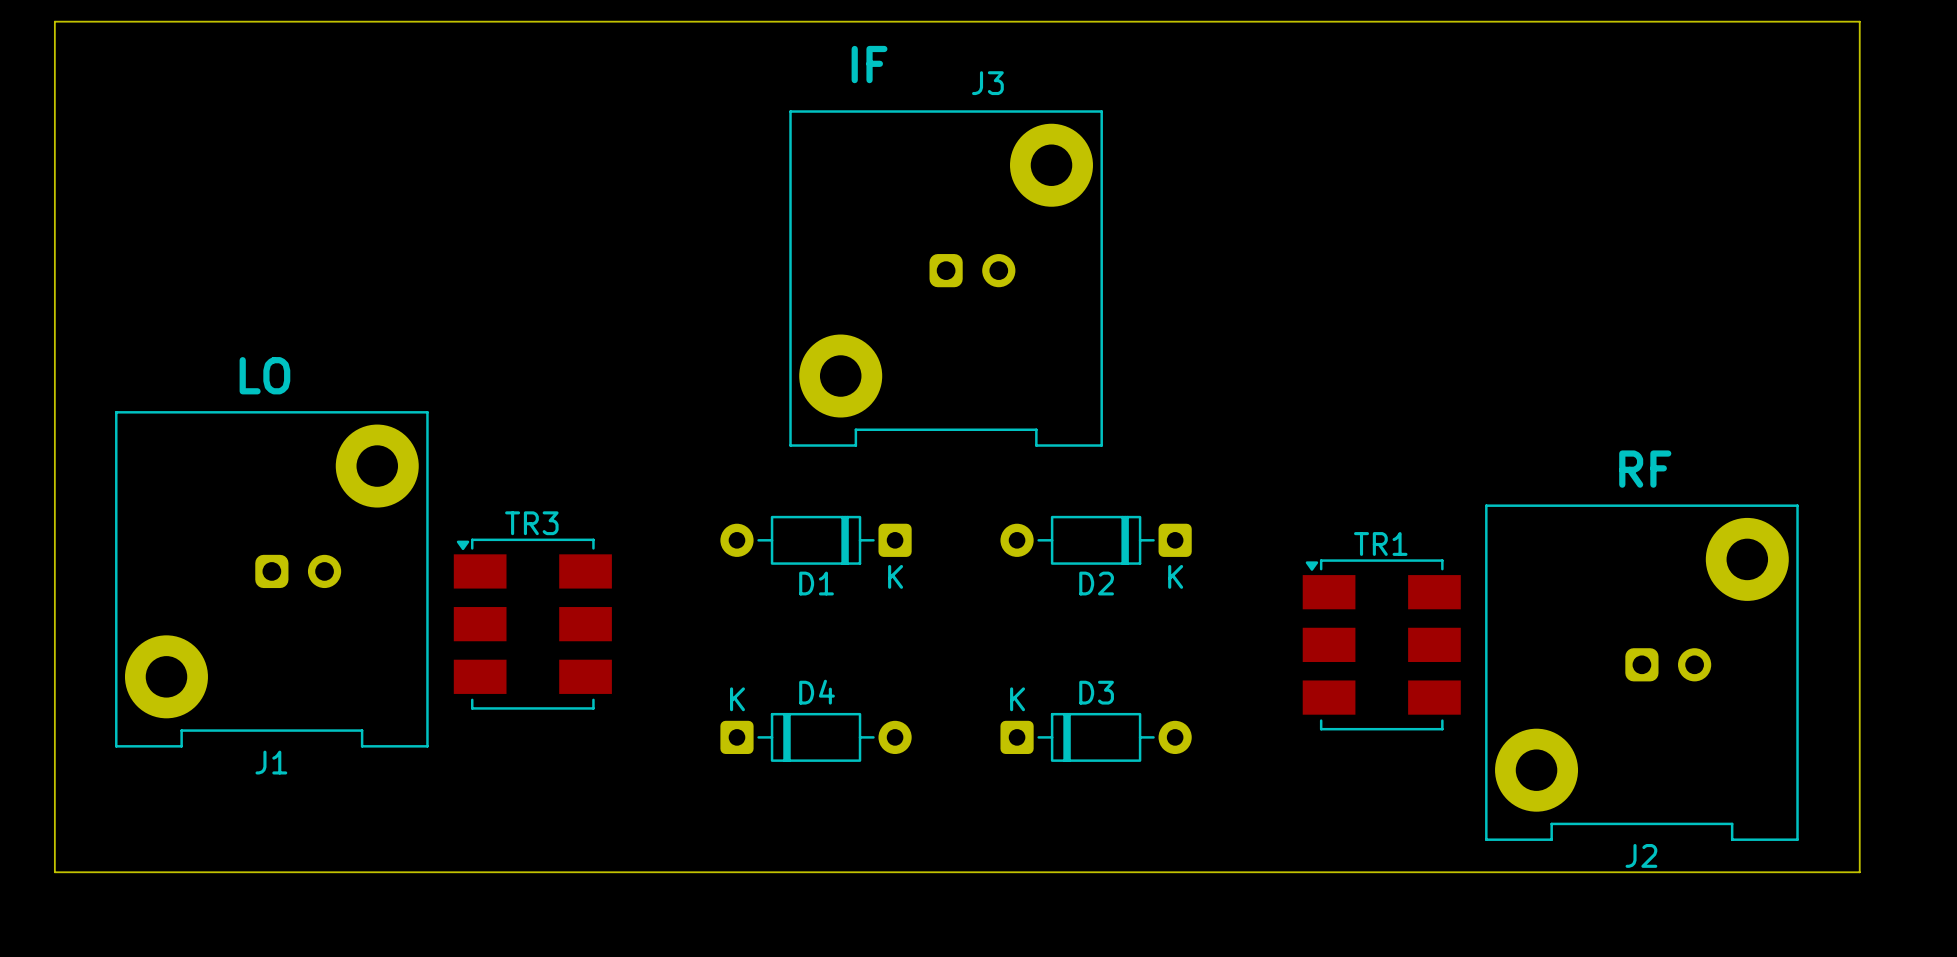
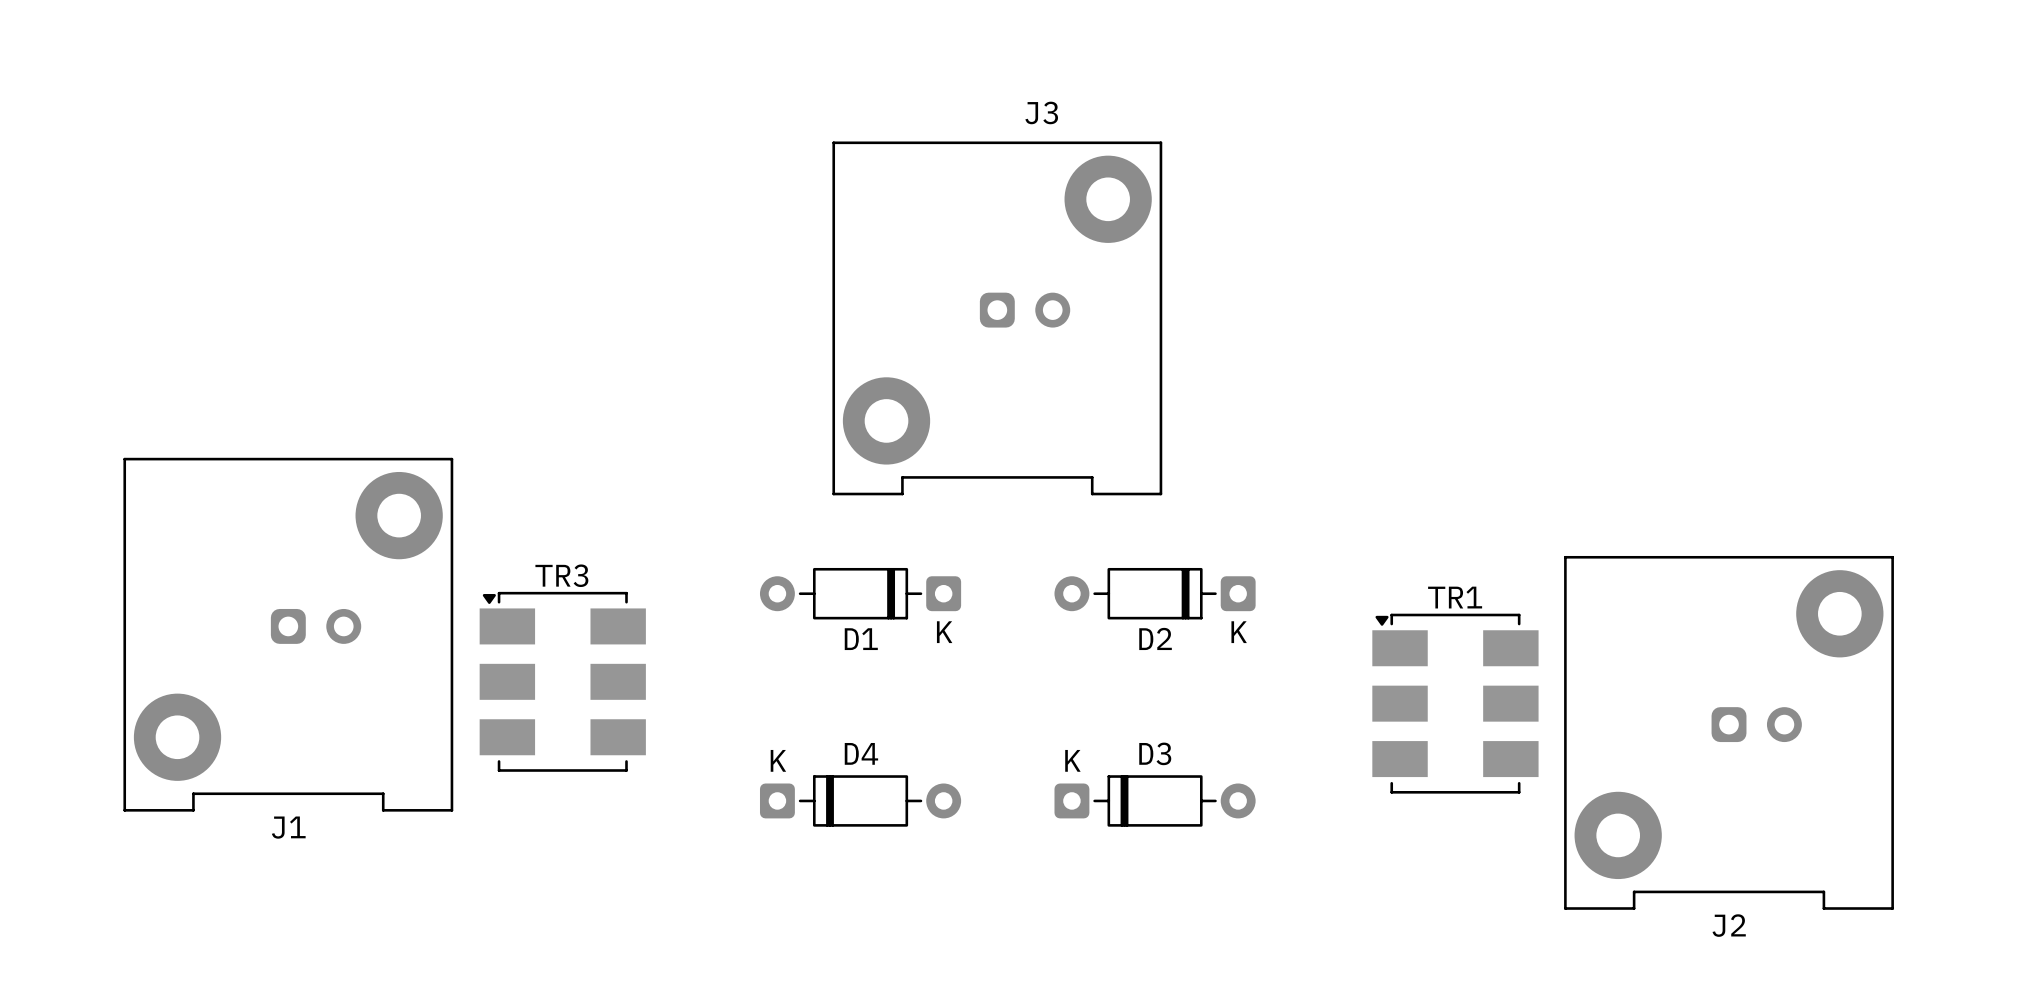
board edge: (54, 21) (1859, 21) (1859, 872) (54, 872) (54, 21) -> none
text: IF (869, 64) -> none
text: LO (264, 375) -> none
text: RF (1645, 469) -> none

